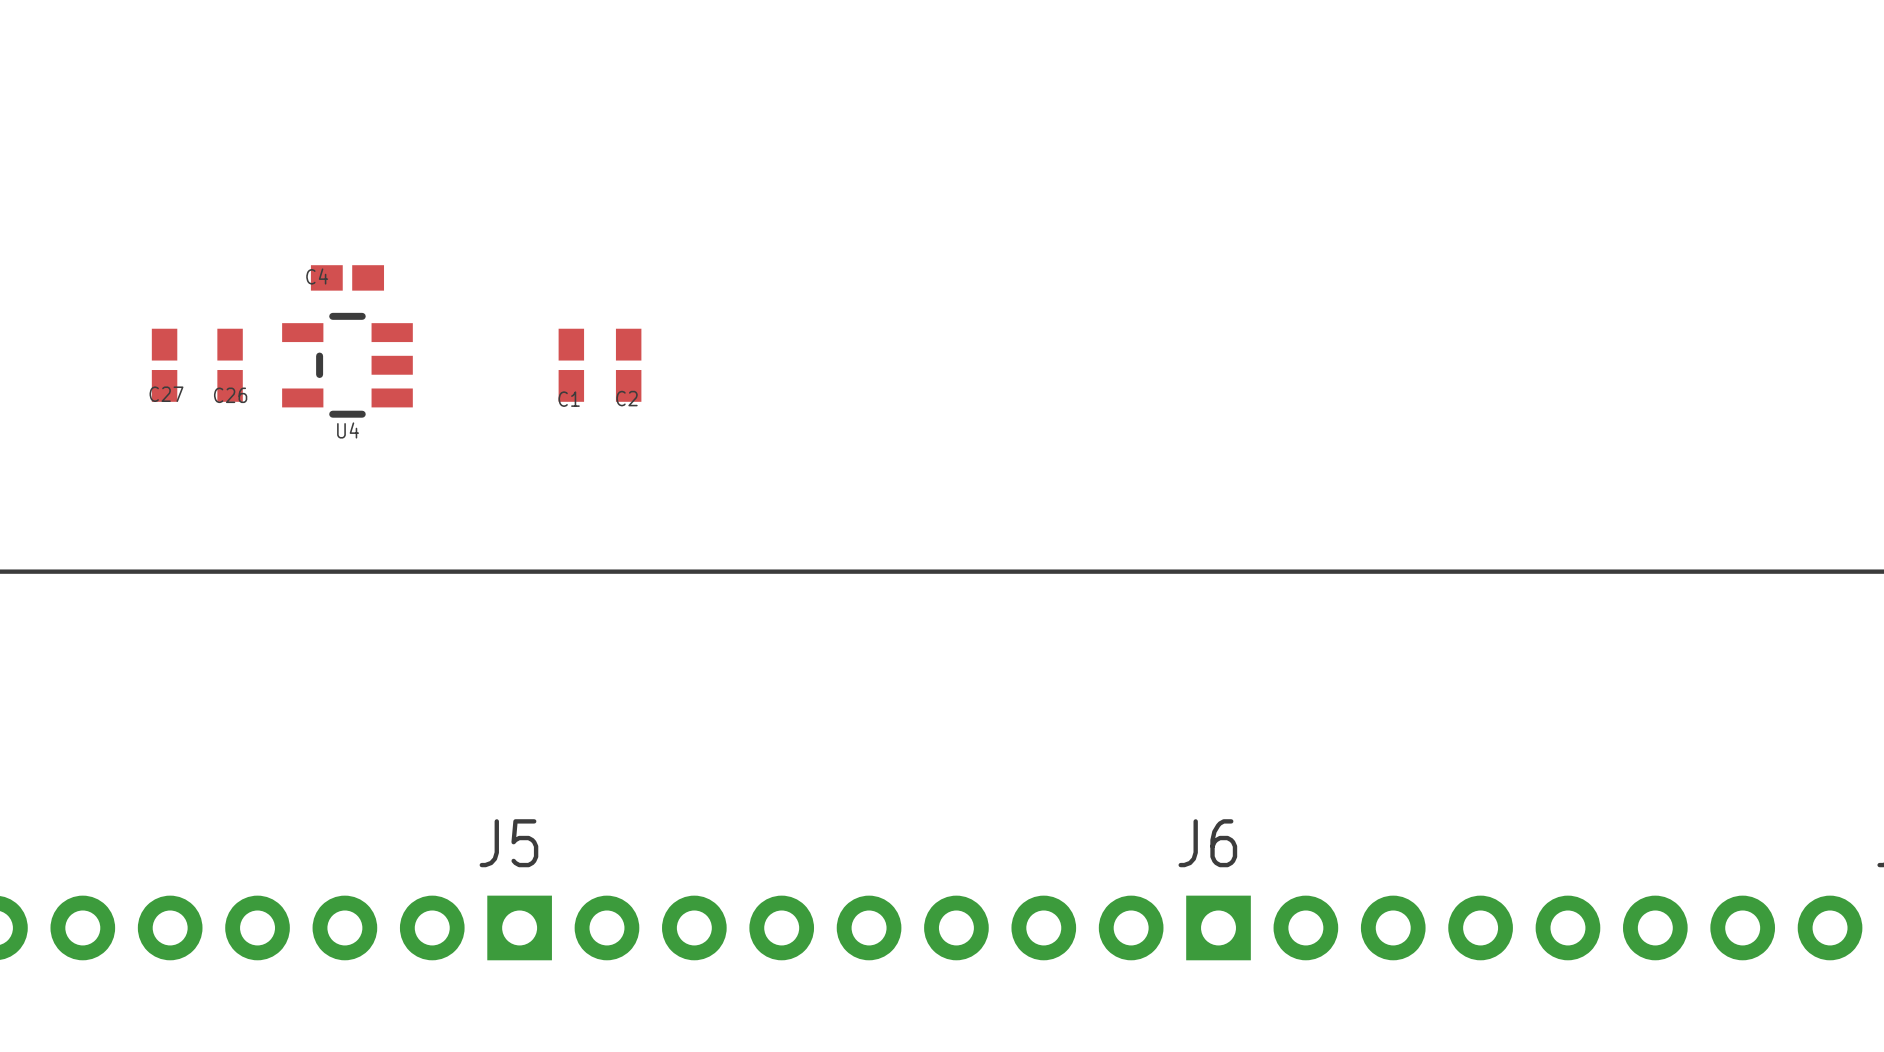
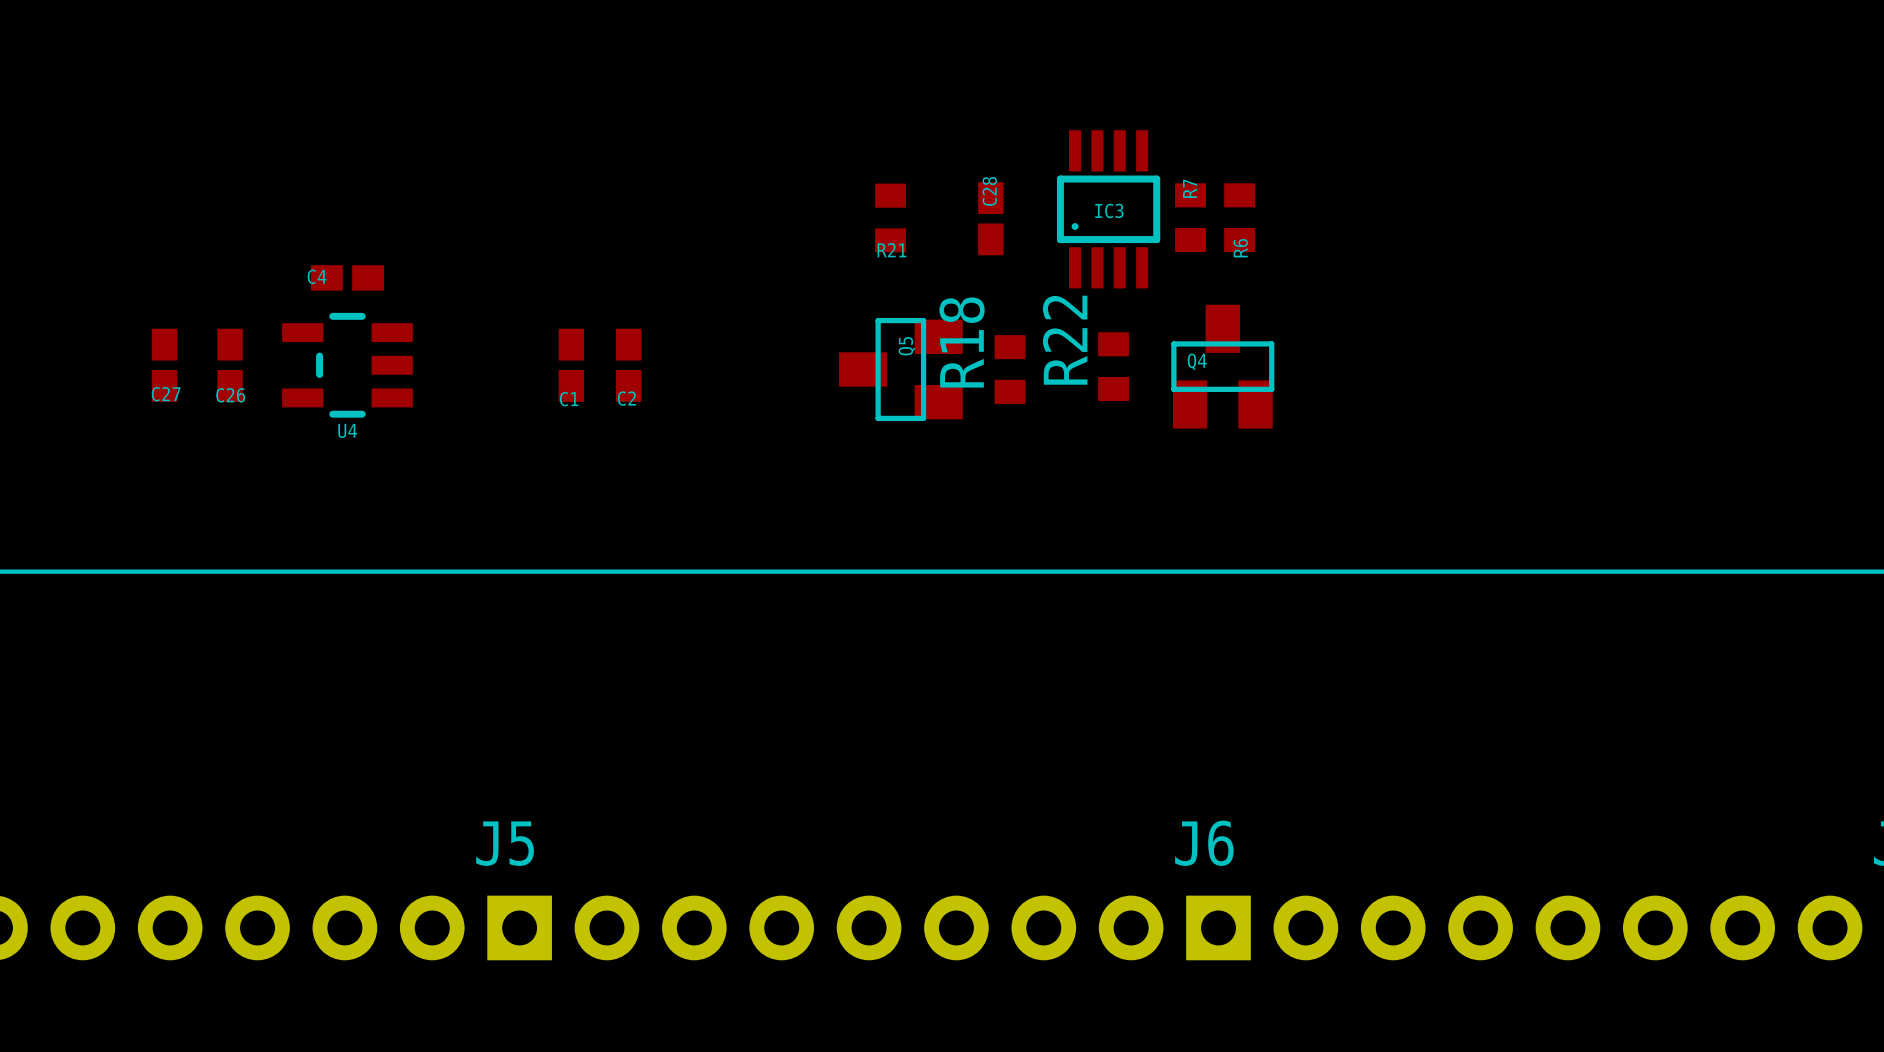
IC3: none -> (1108, 209)
R7: none -> (1190, 217)
R6: none -> (1239, 217)
R21: none -> (890, 218)
C28: none -> (990, 218)
R22: none -> (1113, 366)
Q4: none -> (1222, 366)
Q5: none -> (900, 369)
R18: none -> (1010, 369)

